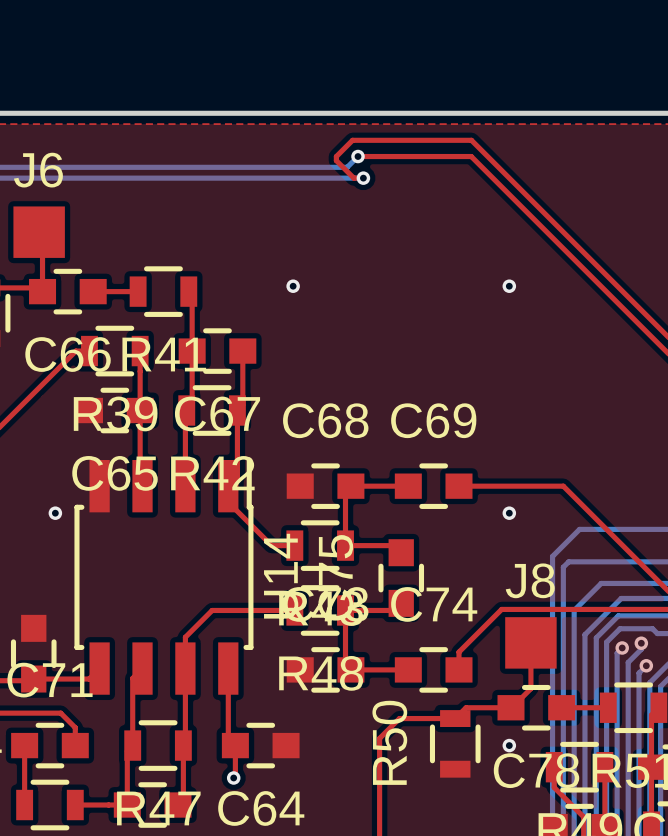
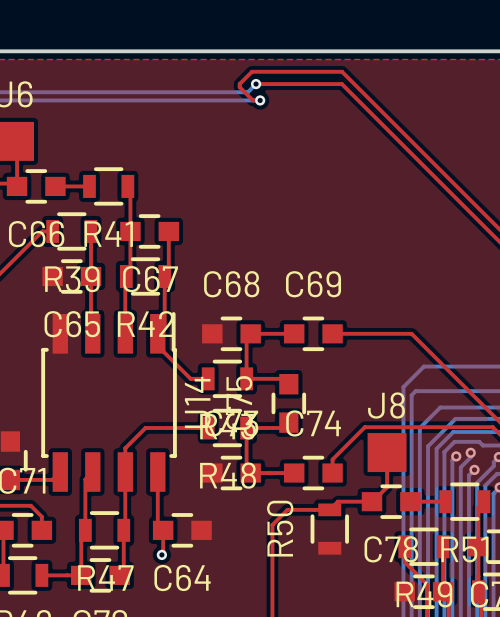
via: (293, 286) -> none
via: (509, 286) -> none
via: (55, 513) -> none
via: (509, 513) -> none
via: (509, 745) -> none

